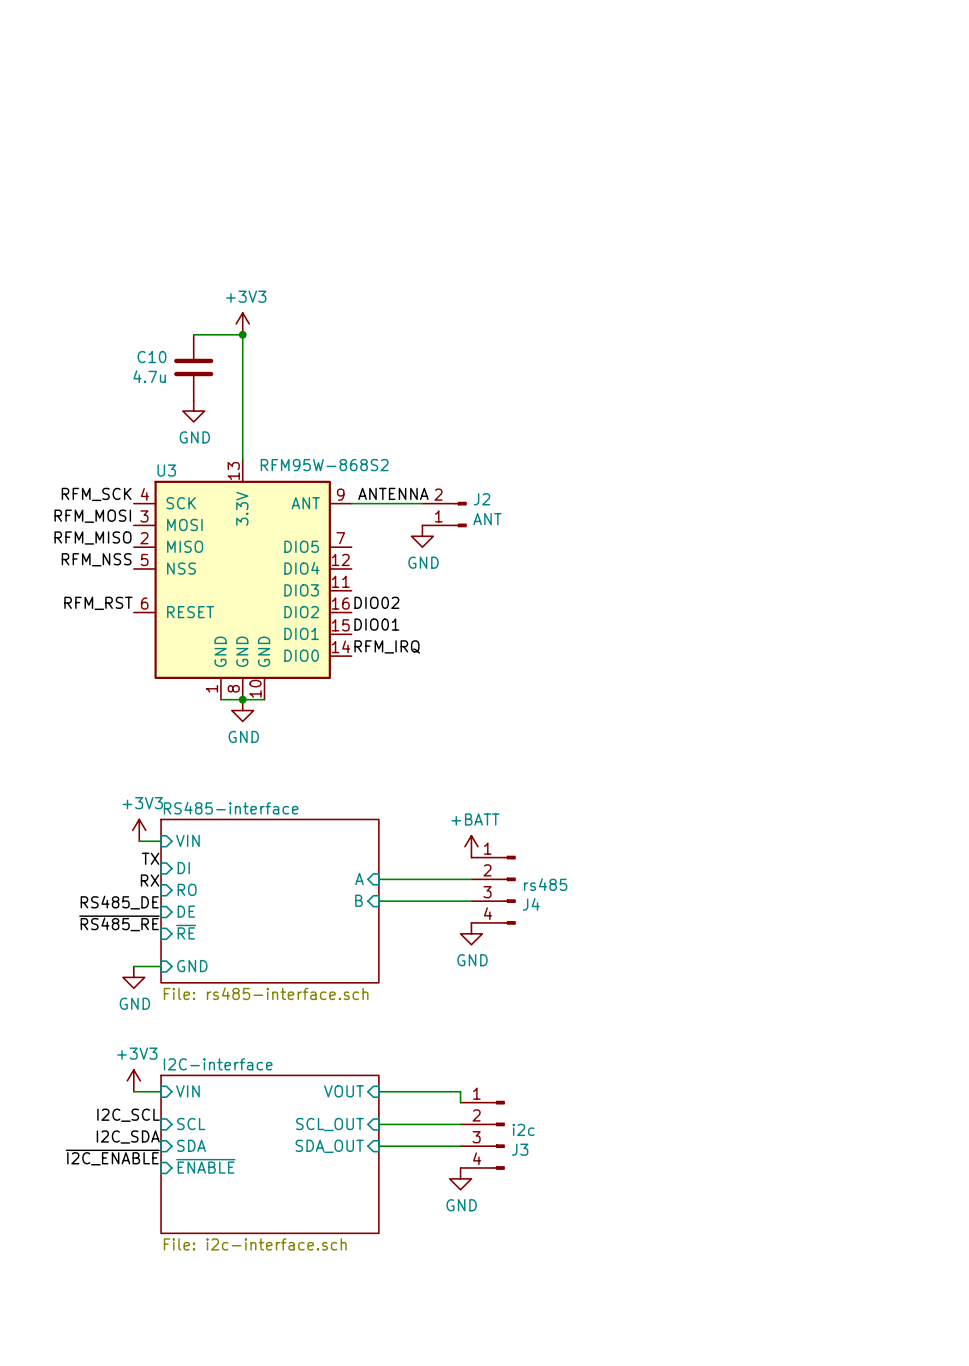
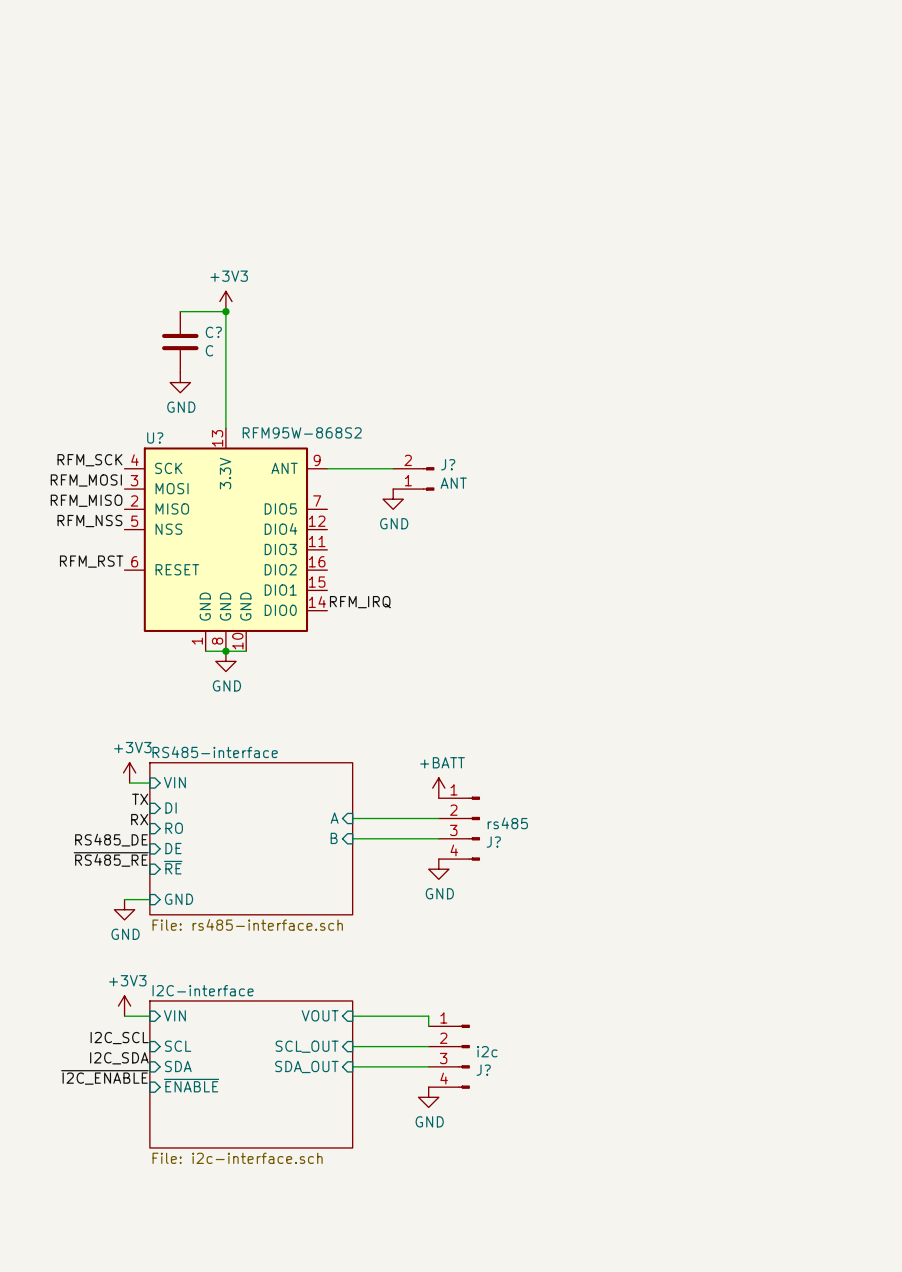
C10 name: C10 (151, 357) -> C? (213, 332)
C10 value: 4.7u (149, 376) -> C (209, 350)
U3 name: U3 (166, 470) -> U? (155, 437)
label: ANTENNA (393, 493) -> none
J2 name: J2 (482, 499) -> J? (448, 464)
label: DIO02 (376, 602) -> none
label: DIO01 (376, 624) -> none
J4 name: J4 (531, 904) -> J? (493, 842)
J3 name: J3 (520, 1149) -> J? (483, 1070)

